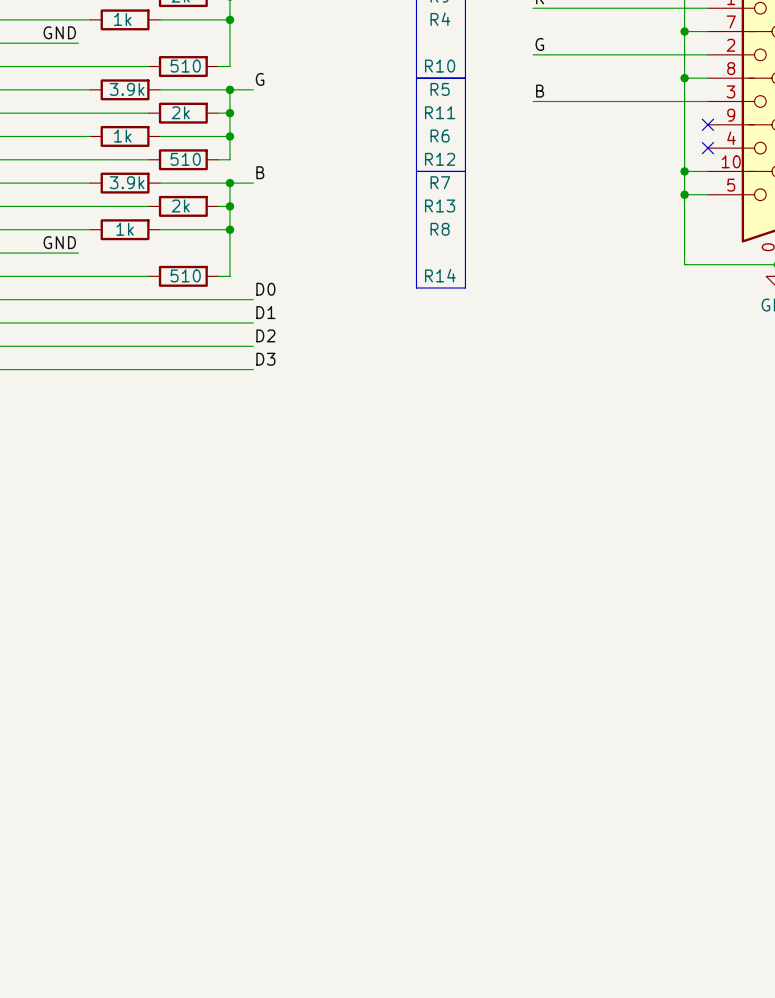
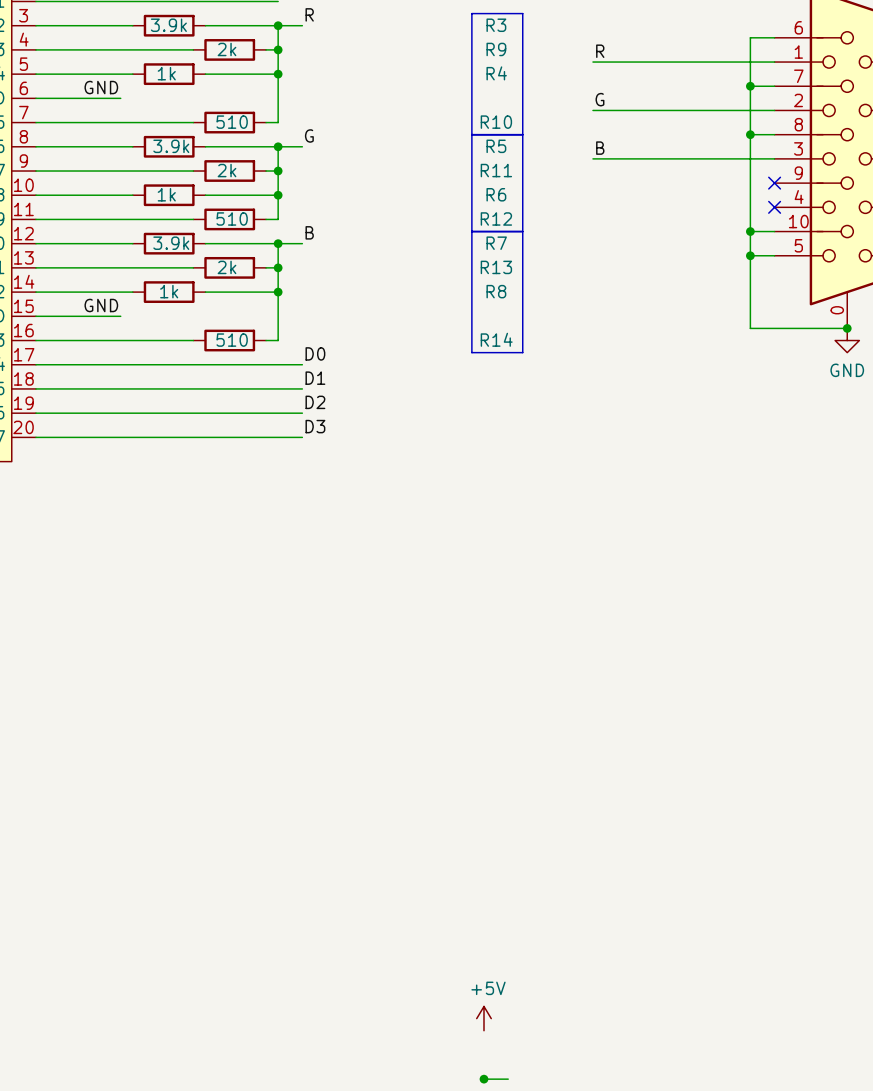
power symbol: none -> +5V (483, 1018)
wire: none -> (483, 1079) (508, 1079)
junction: none -> (483, 1079)

